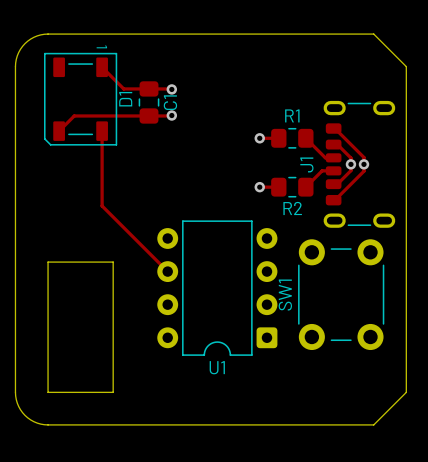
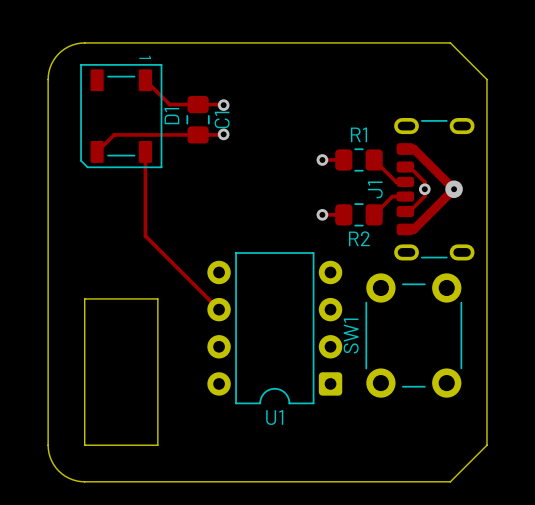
track: (334, 128) (363, 157) (363, 171) (334, 200) -> (406, 149) (413, 149) (454, 189) (413, 229) (406, 229)
via position: (363, 164) -> (454, 189)

